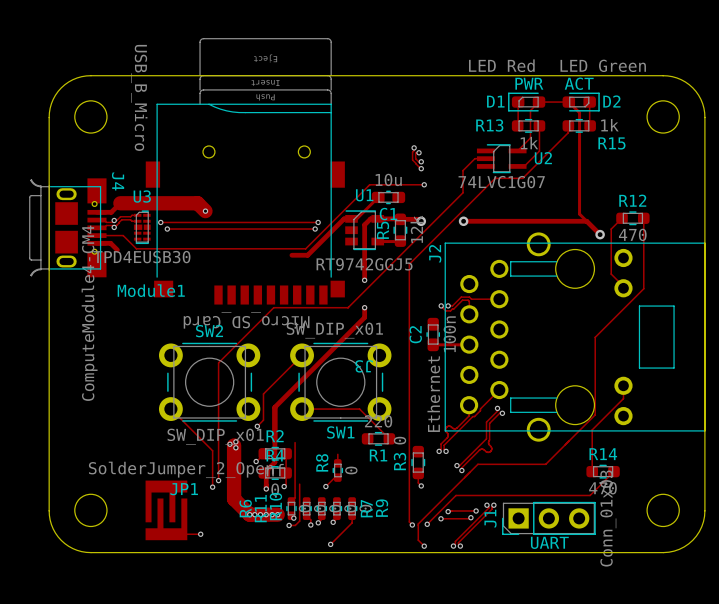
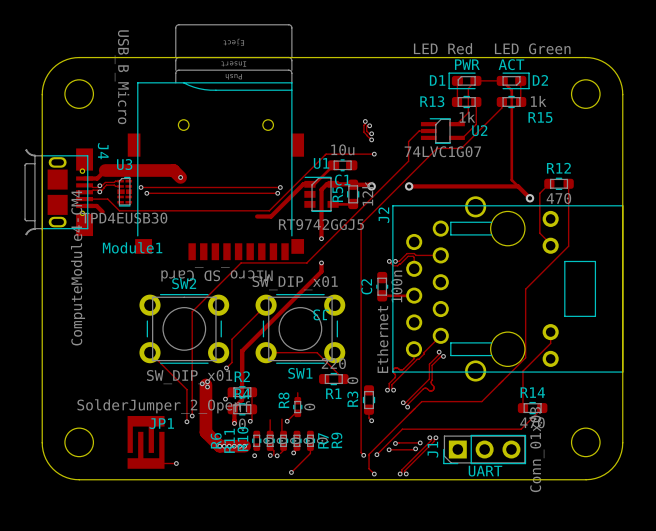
track: (295, 442) (295, 497) (291, 501) -> none
track: (299, 484) (299, 521) (295, 525) (289, 525) -> none
track: none -> (270, 419) (270, 436)
track: none -> (281, 419) (281, 434)
via: (293, 518) -> none
via: (318, 522) -> none
via: none -> (270, 455)
via: (310, 525) -> none
via: none -> (277, 455)

